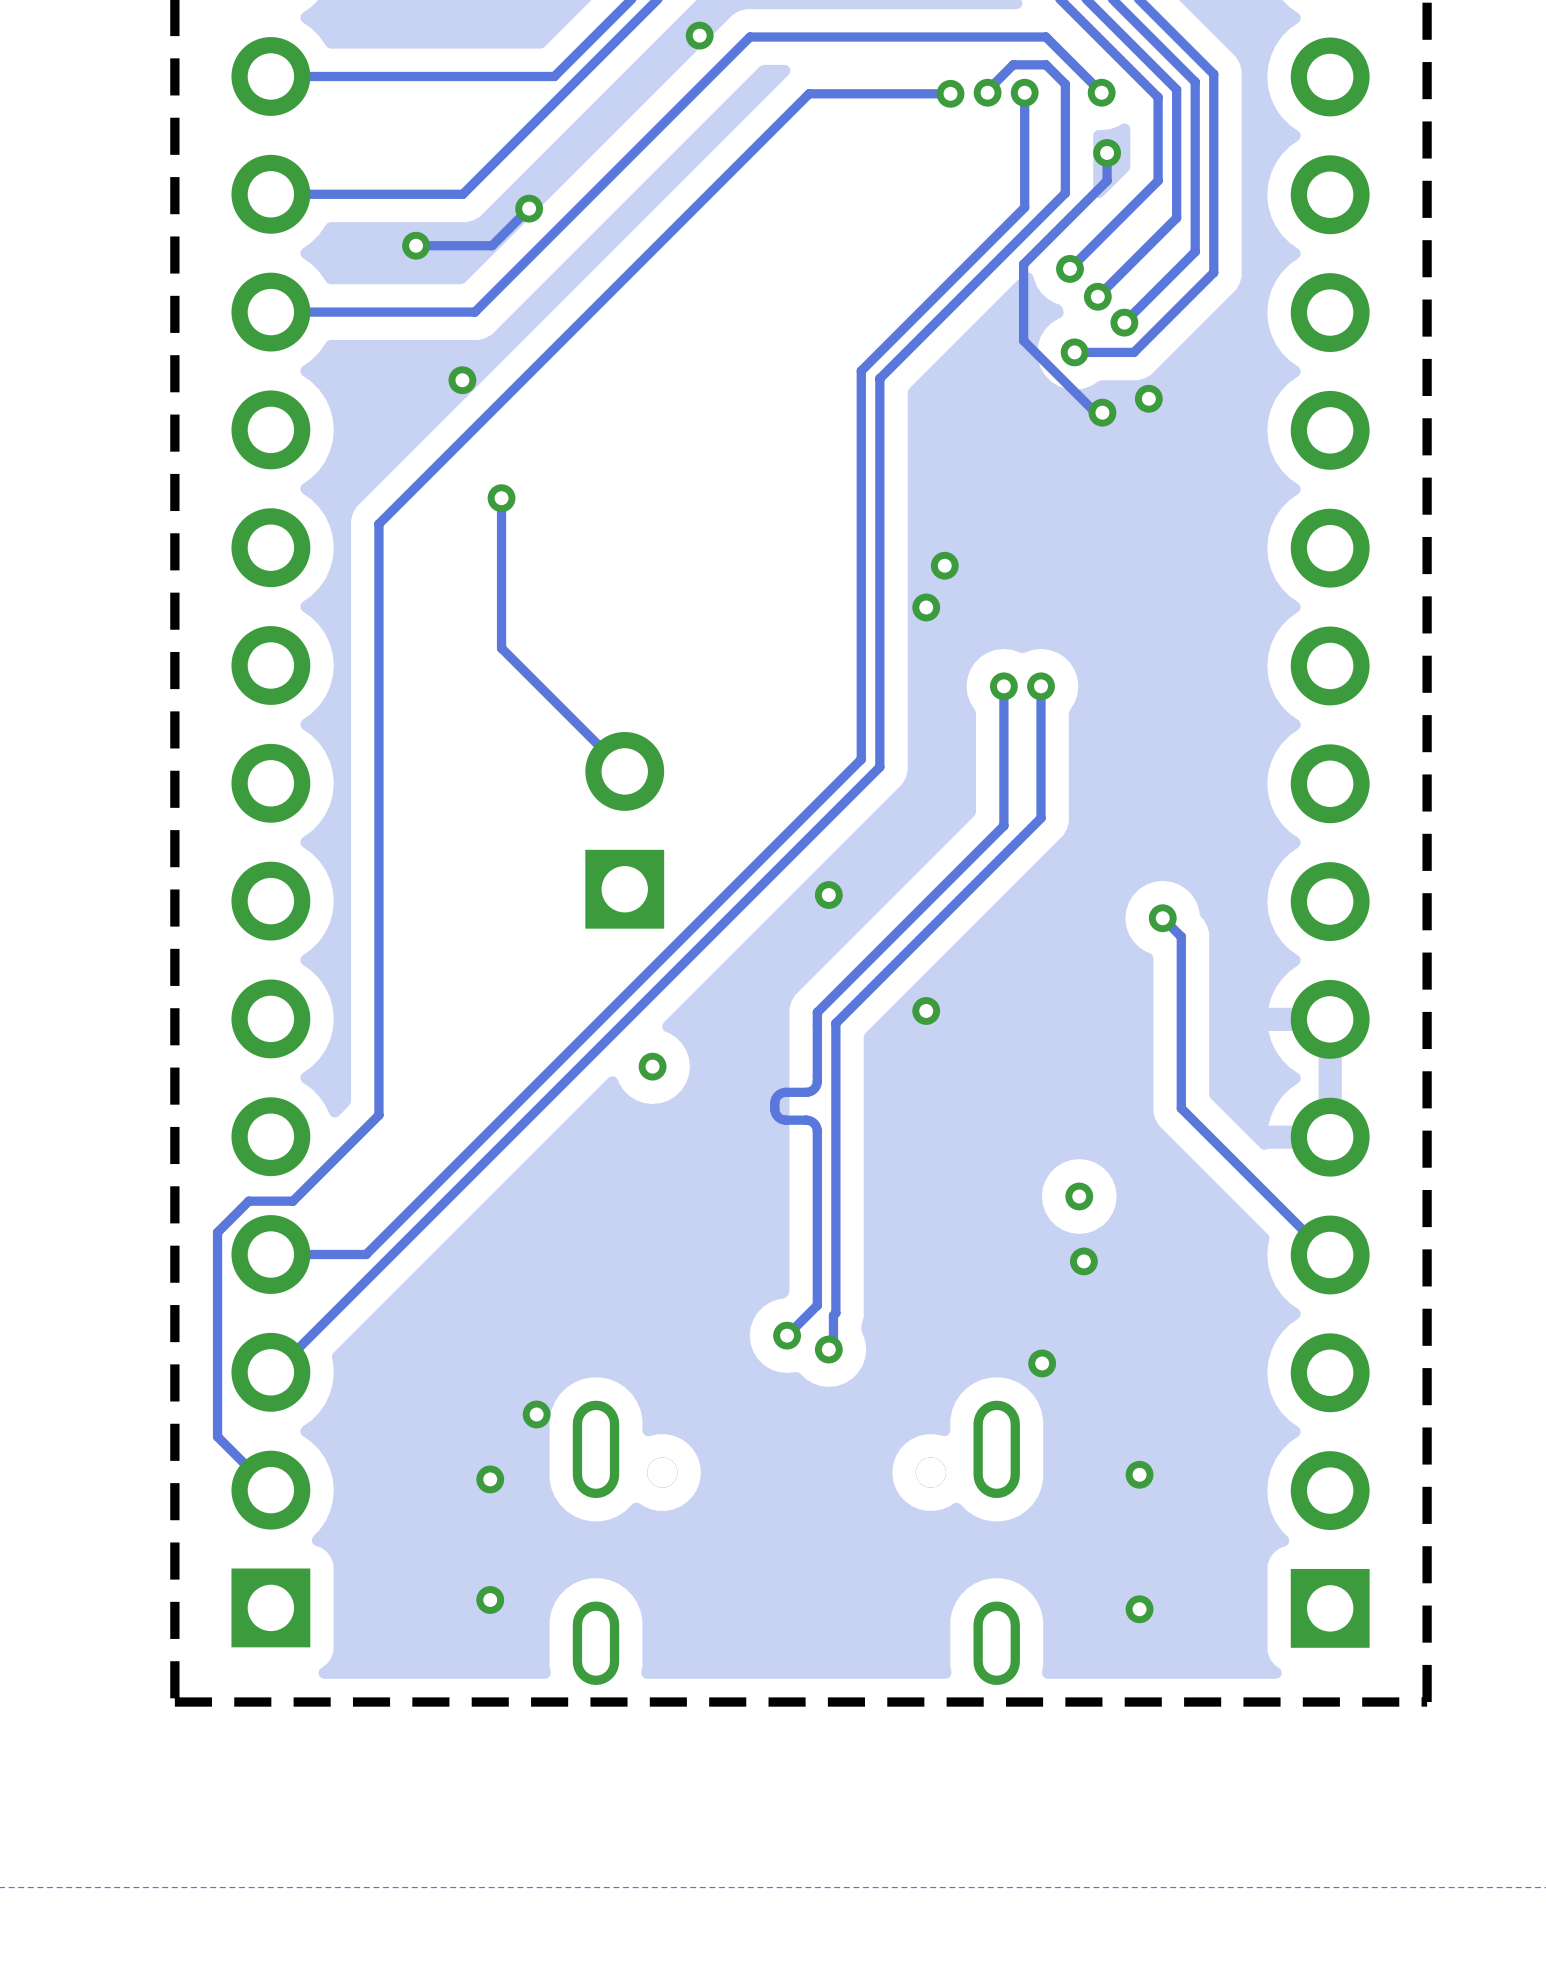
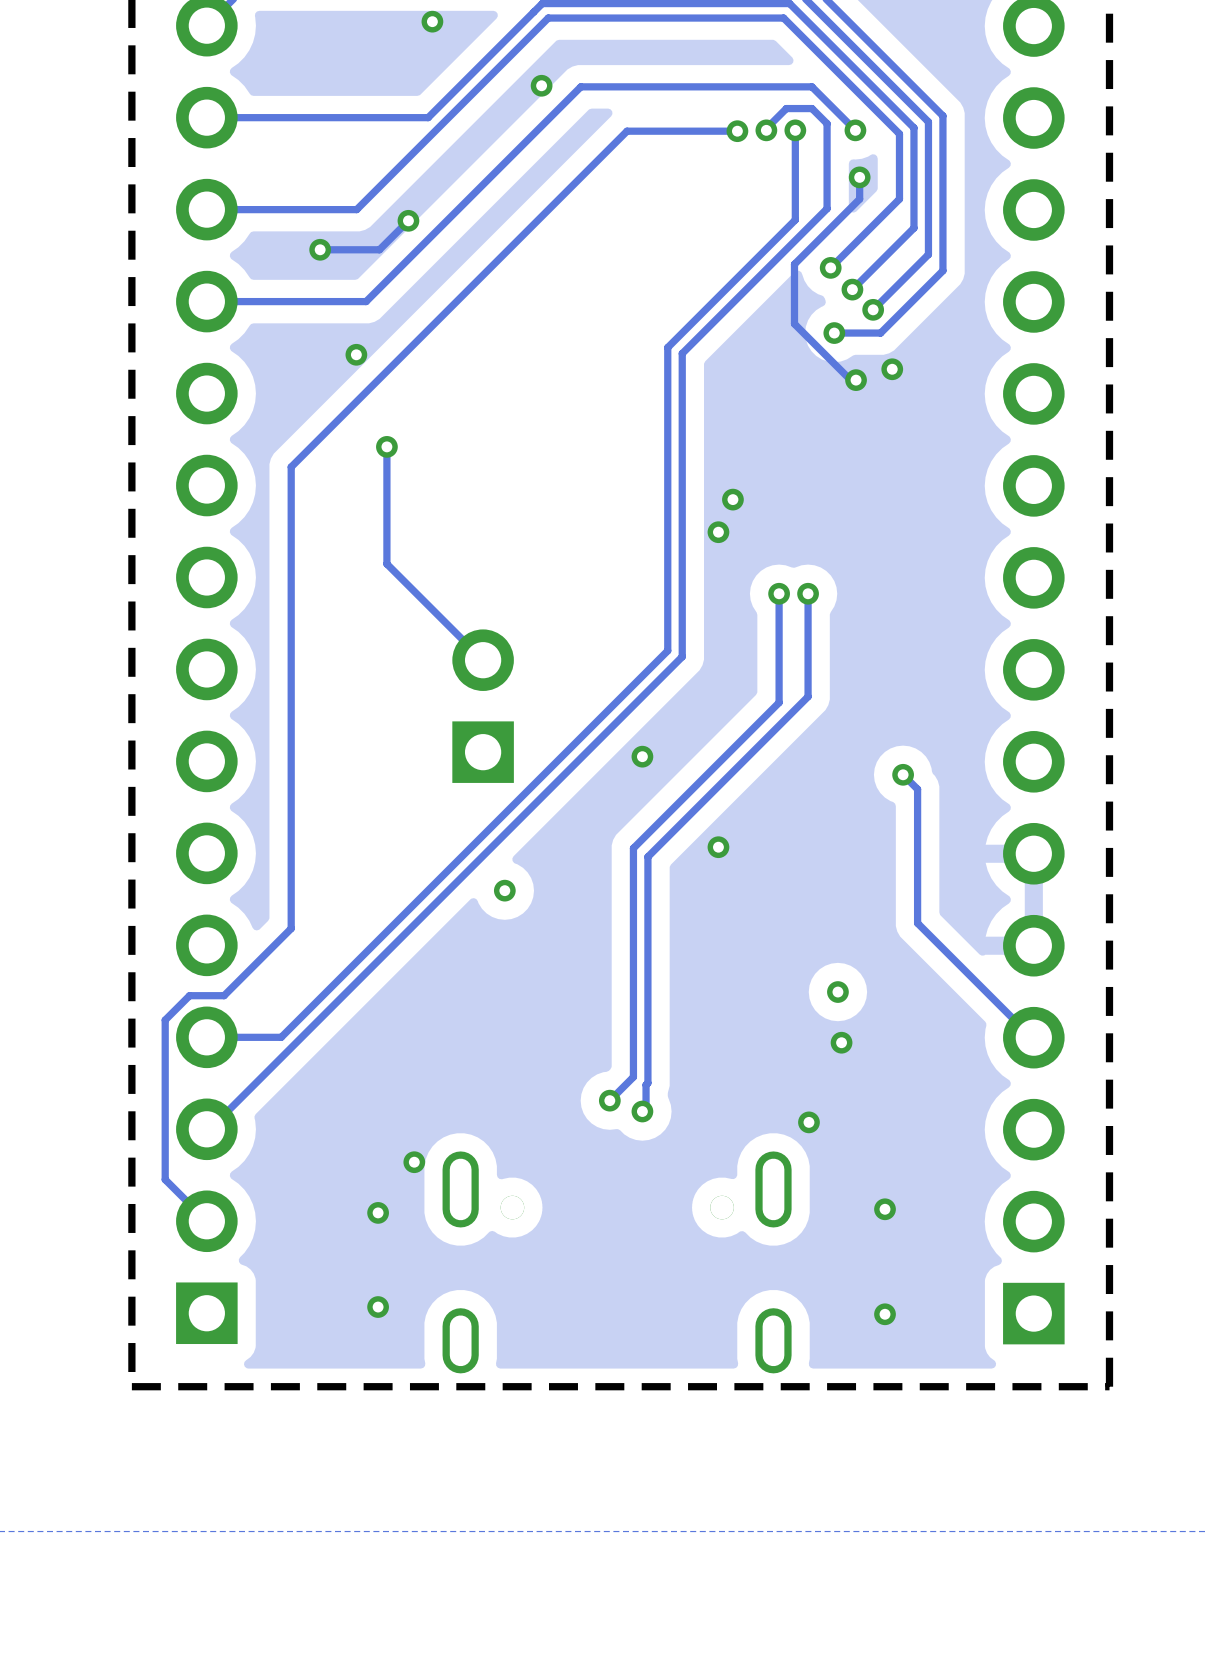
track: (817, 1081) (814, 1088) (809, 1091) (781, 1093) (776, 1097) (774, 1103) (775, 1112) (779, 1118) (809, 1120) (814, 1124) (817, 1131) -> (633, 902) (633, 941)

